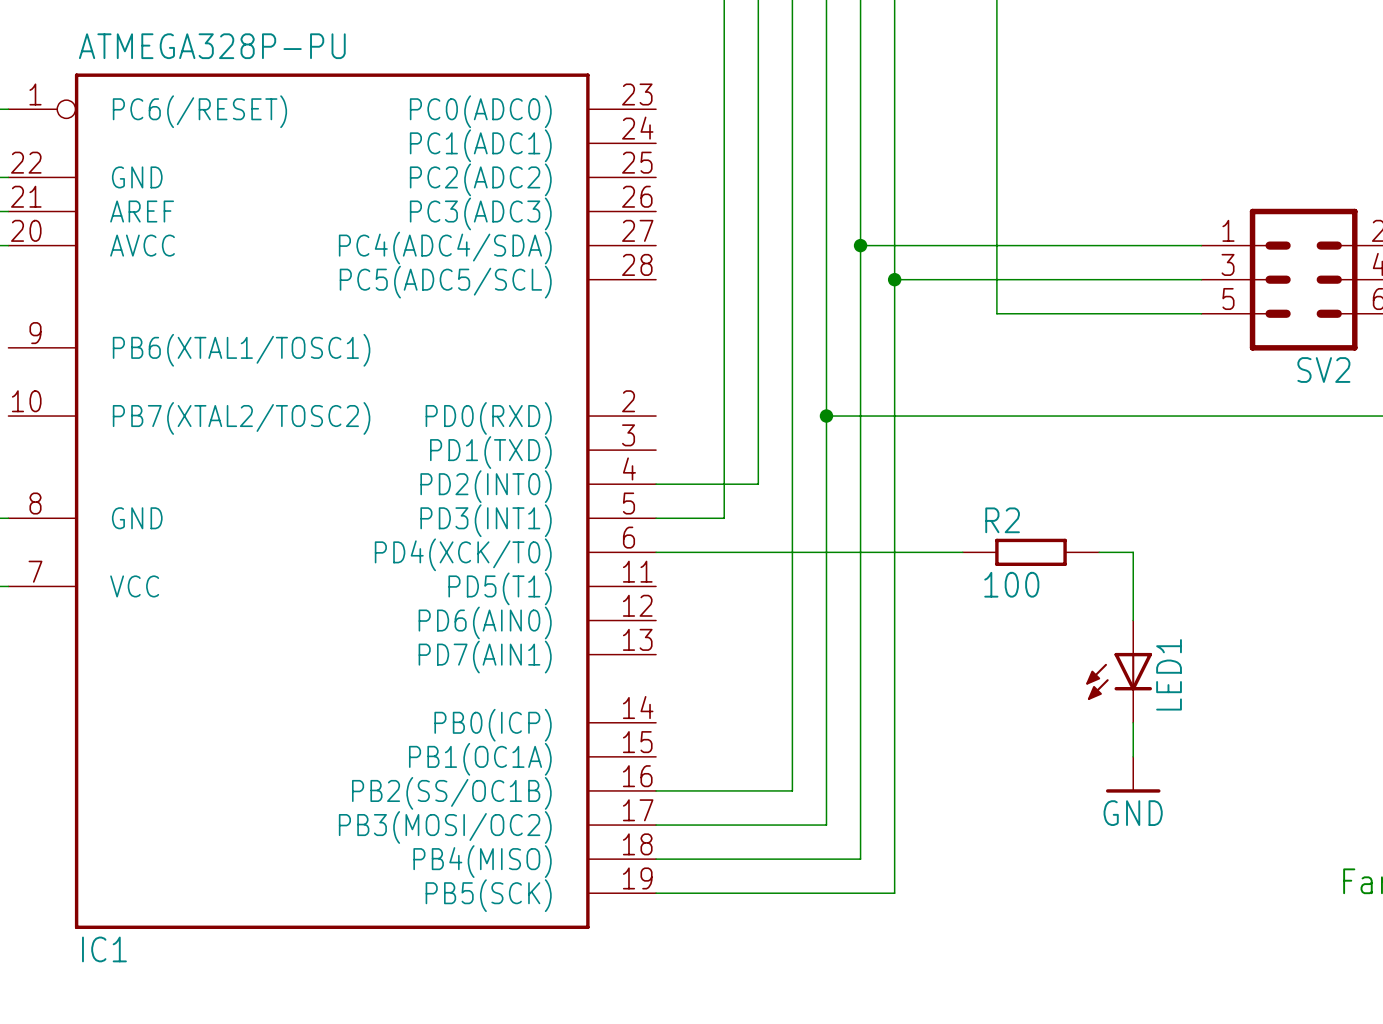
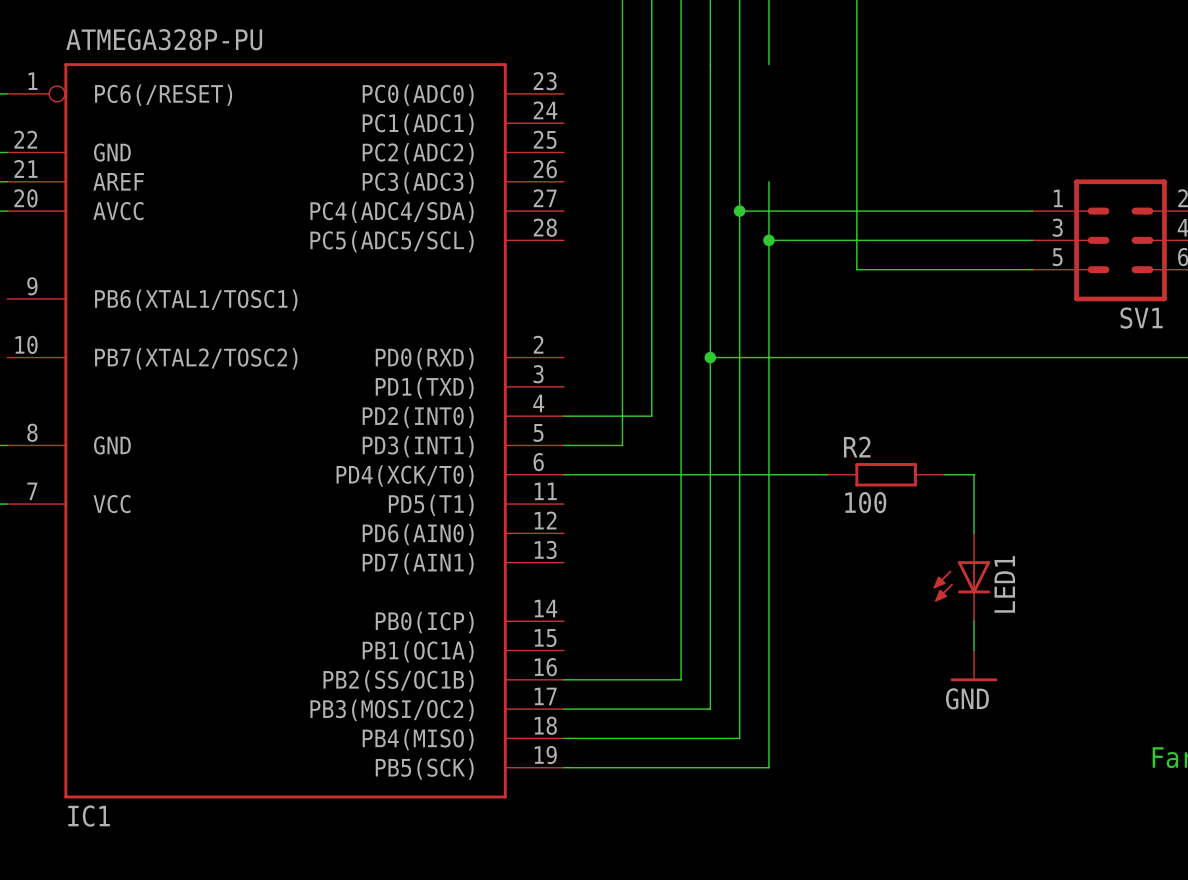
wire: (894, 75) (894, 211) -> none
SV2 name: SV2 (1323, 370) -> SV1 (1141, 318)

